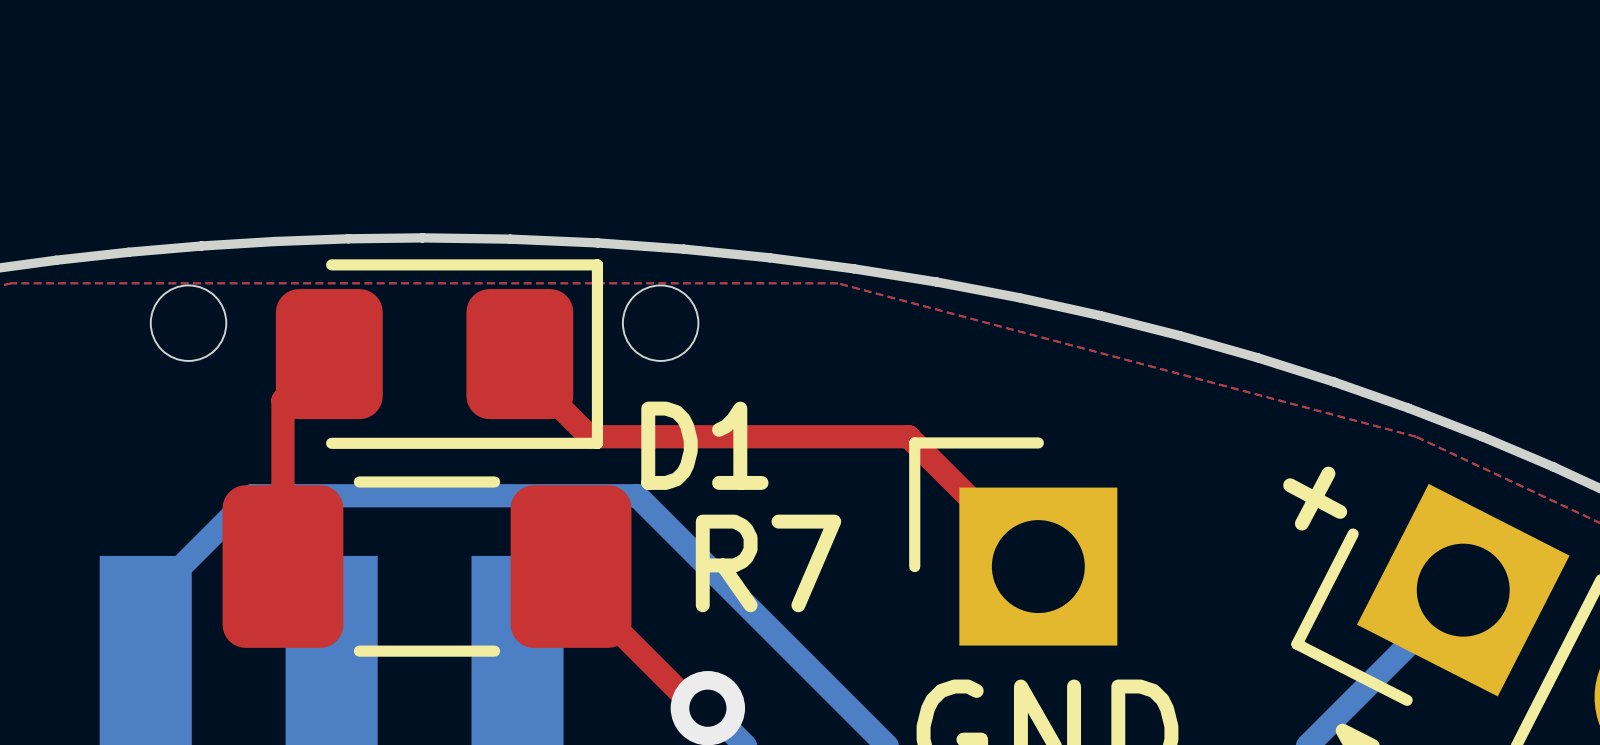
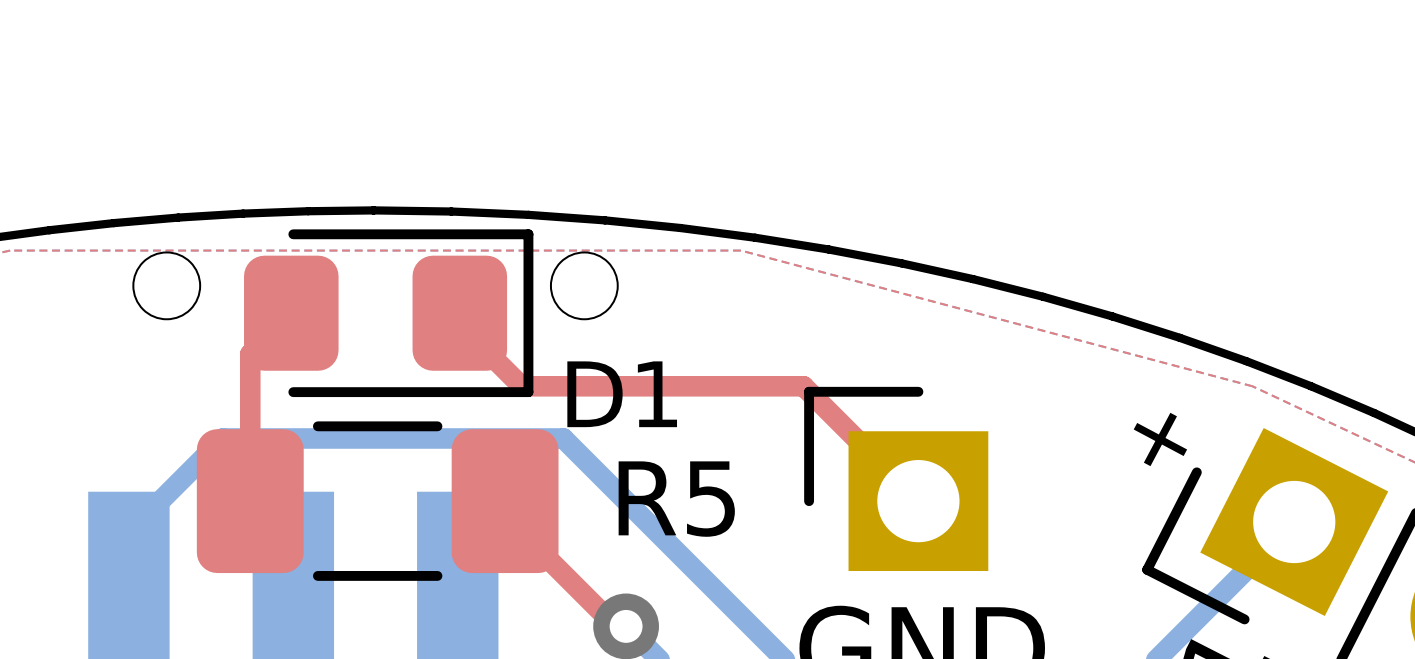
R7 name: R7 (768, 563) -> R5 (676, 499)

